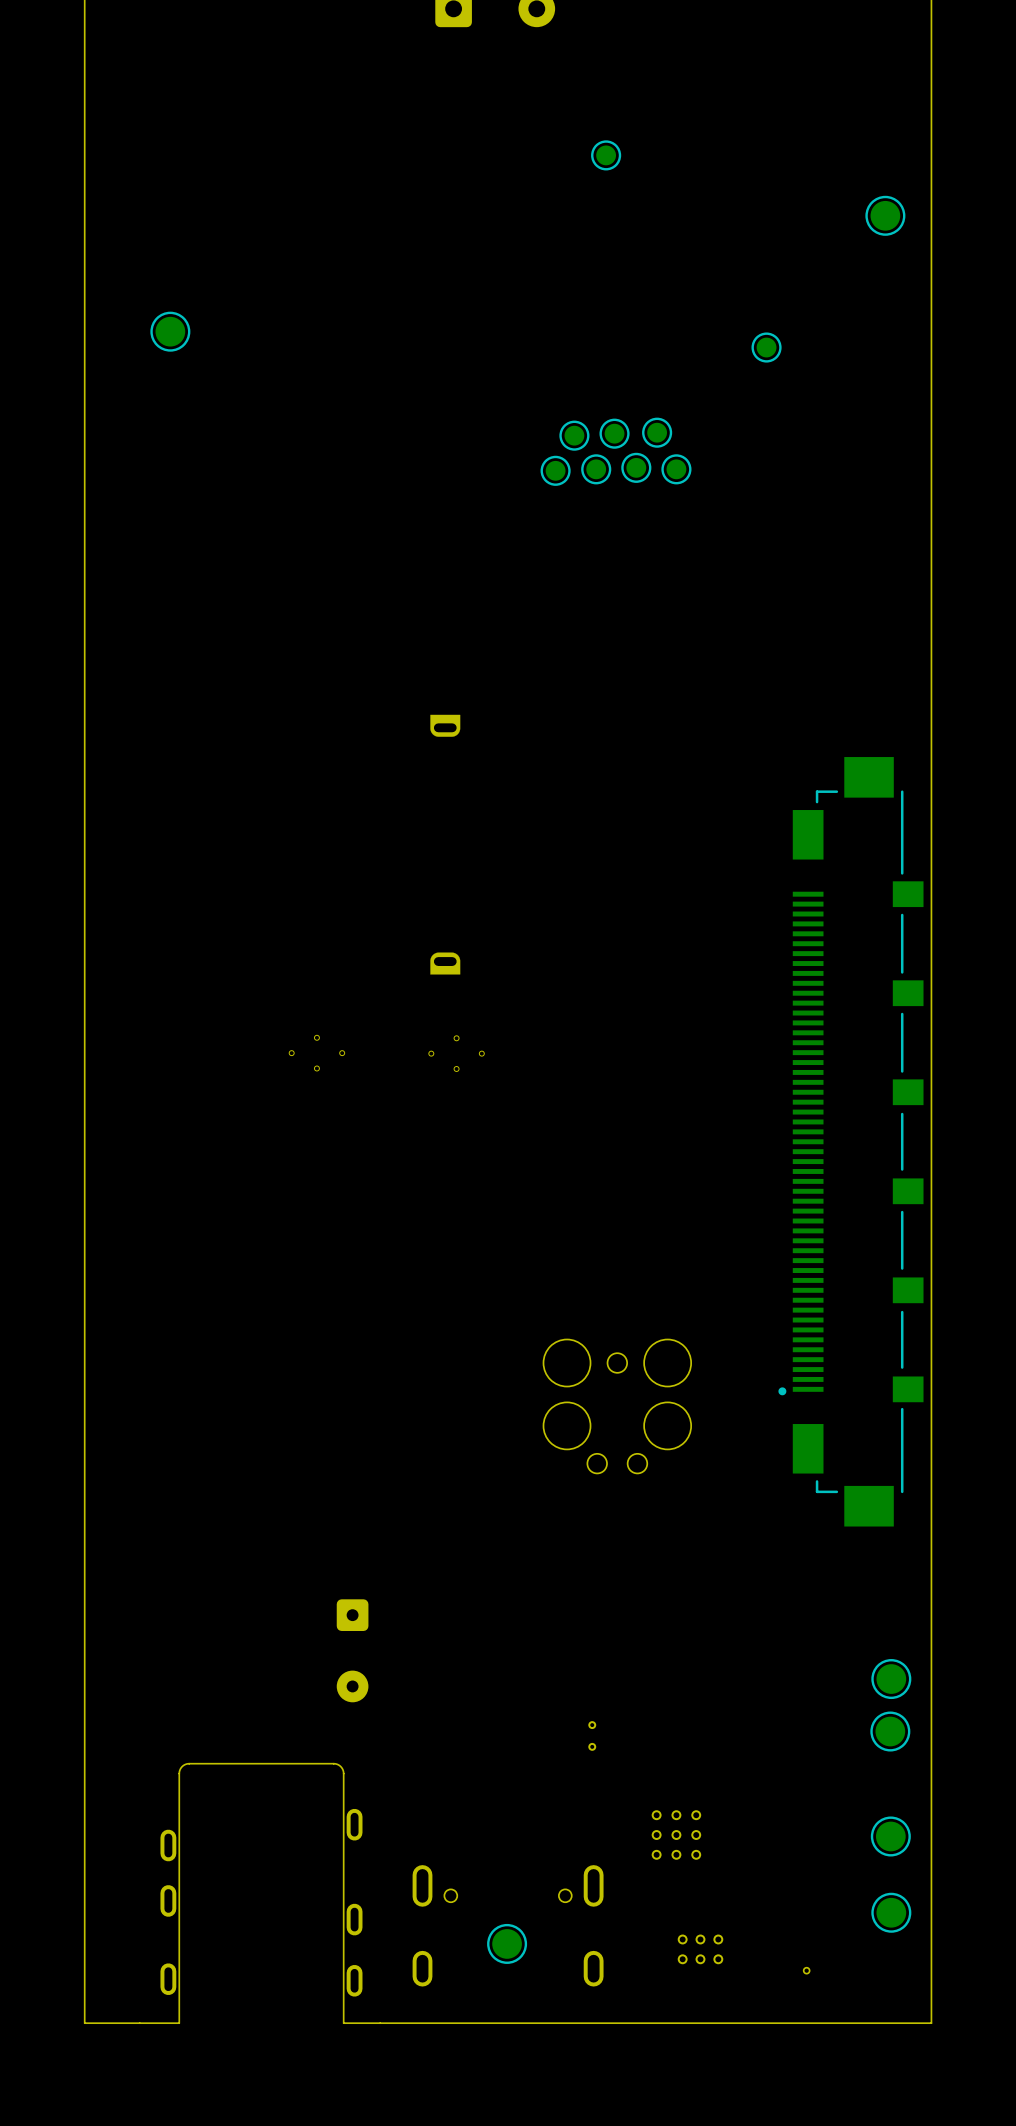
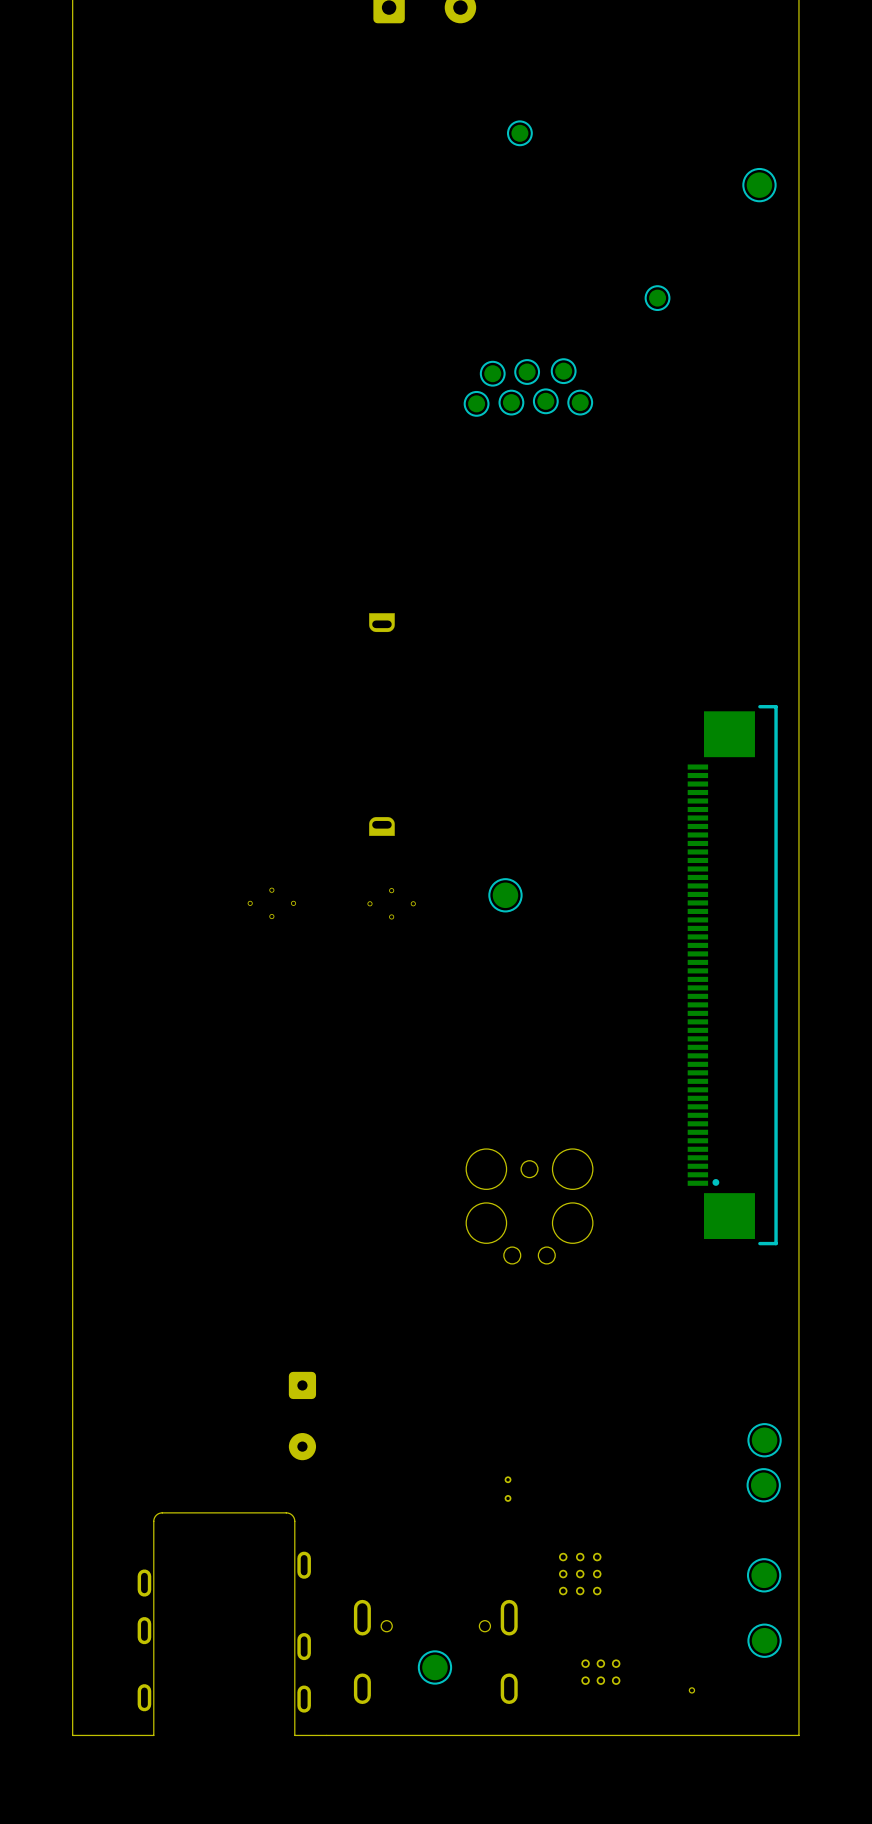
part: (170, 331) -> none
part footprint: [778, 757, 924, 1527] -> [687, 705, 778, 1246]
part: none -> (505, 895)

